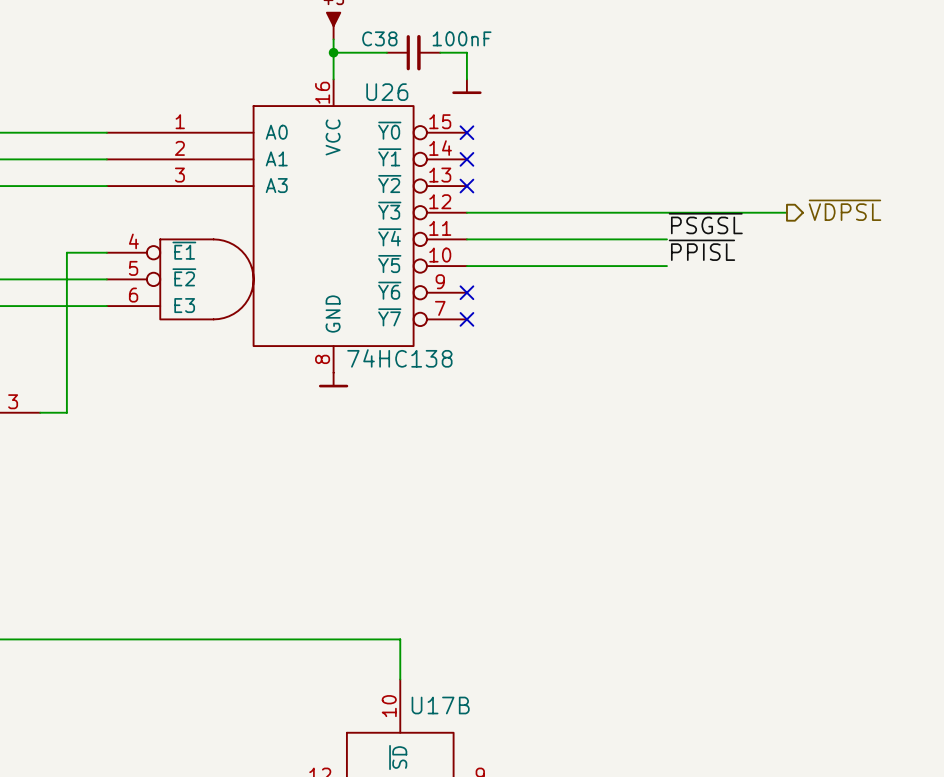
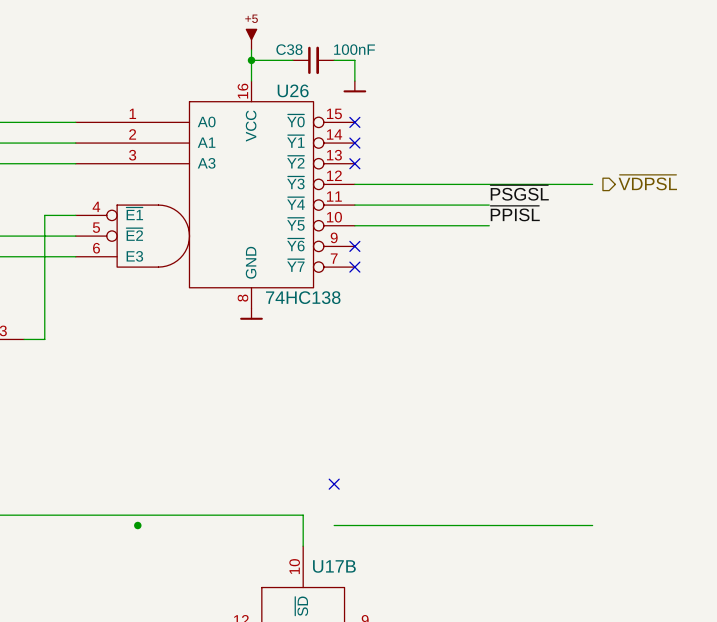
wire: (773, 212) (786, 212) -> none
label position: ~{PSGSL} (705, 223) -> ~{PSGSL} (519, 192)
wire: (640, 239) (666, 239) -> none
label position: ~{PPISL} (701, 250) -> ~{PPISL} (515, 213)
wire: (640, 266) (666, 266) -> none
no-connect mark: none -> (334, 484)
junction: none -> (137, 525)
wire: none -> (334, 525) (592, 525)

